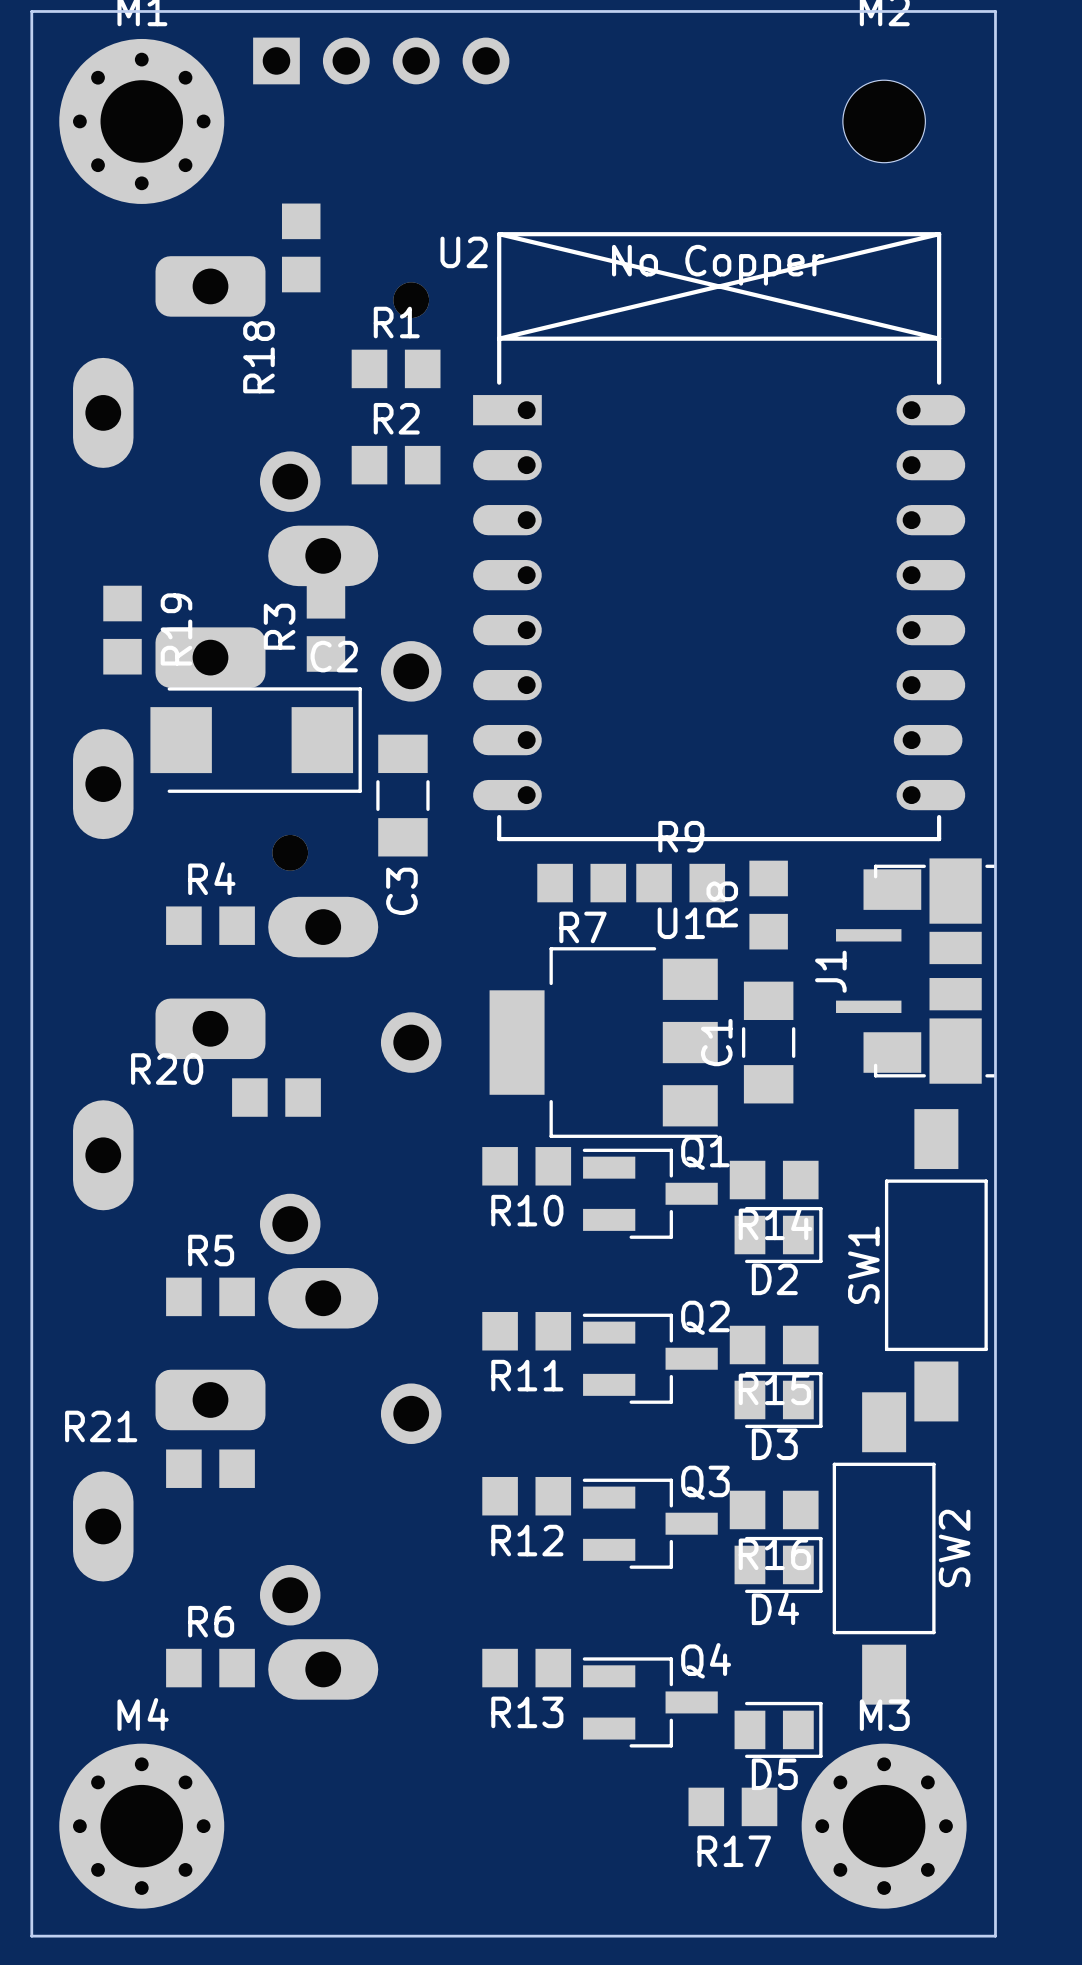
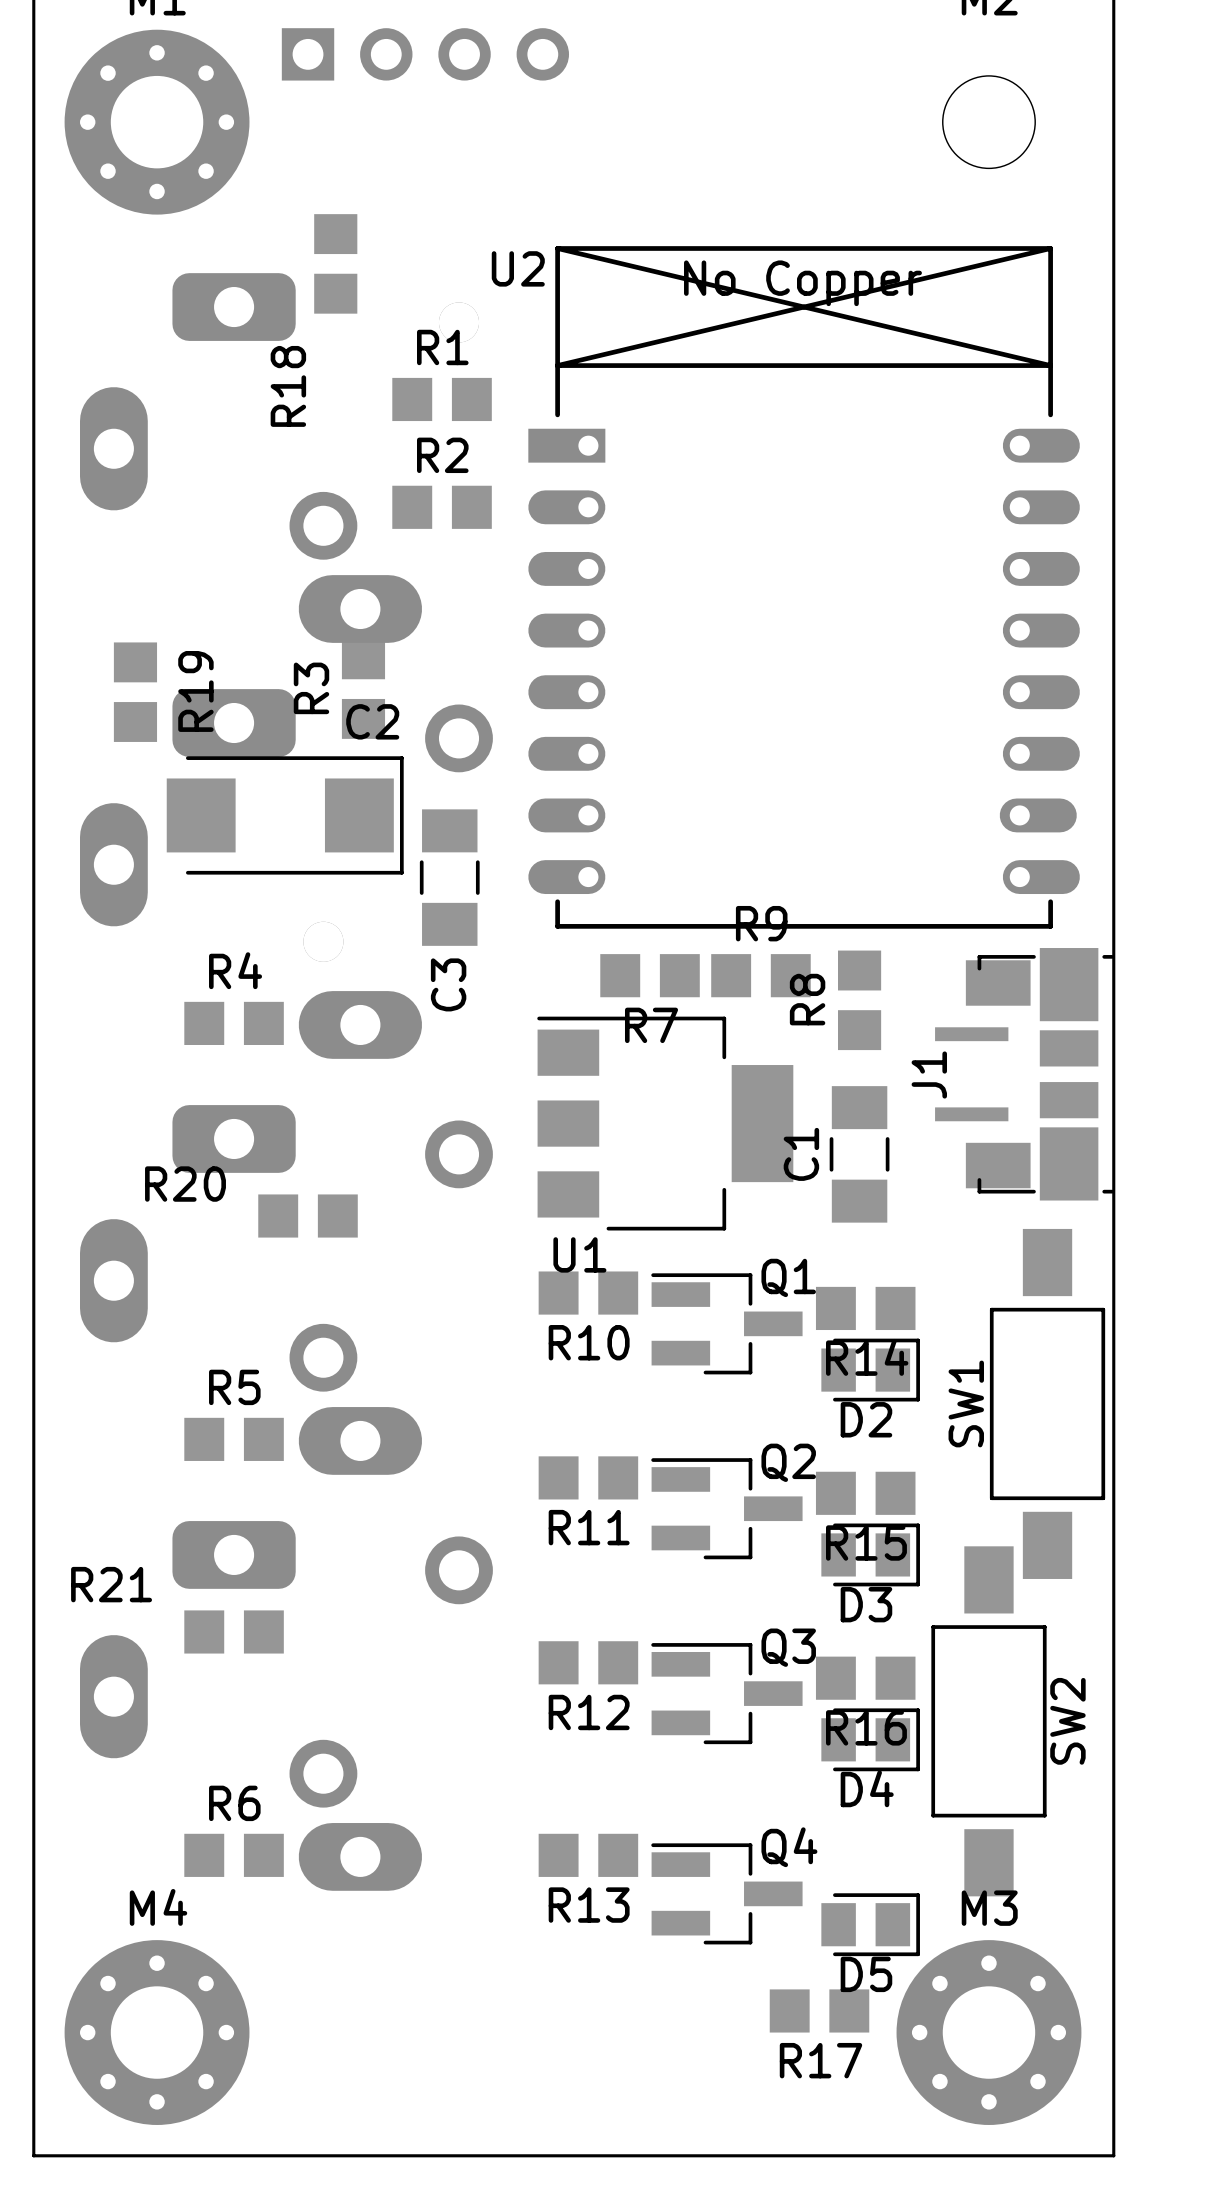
U1 rotation: 0° (603, 1042) -> 180° (665, 1123)

